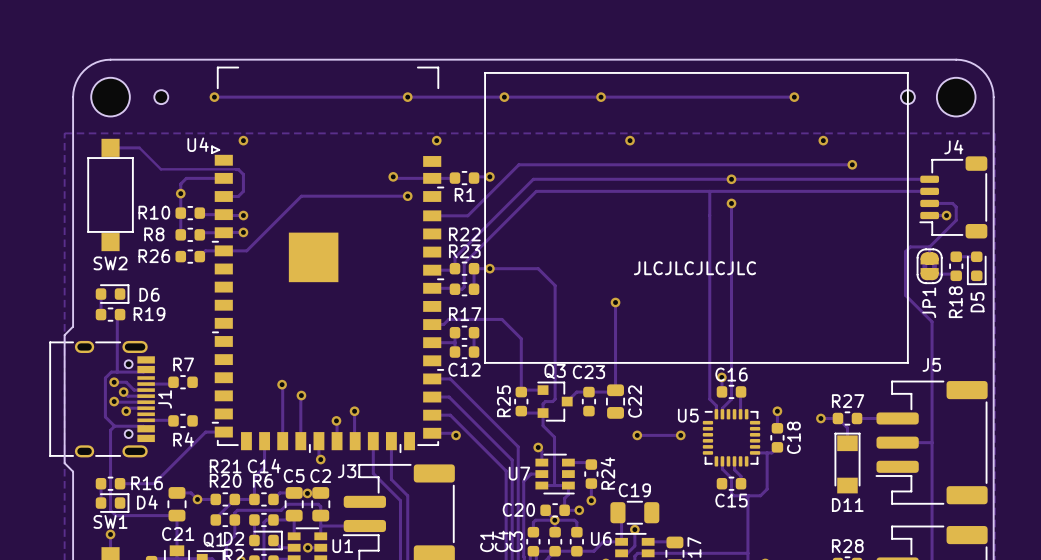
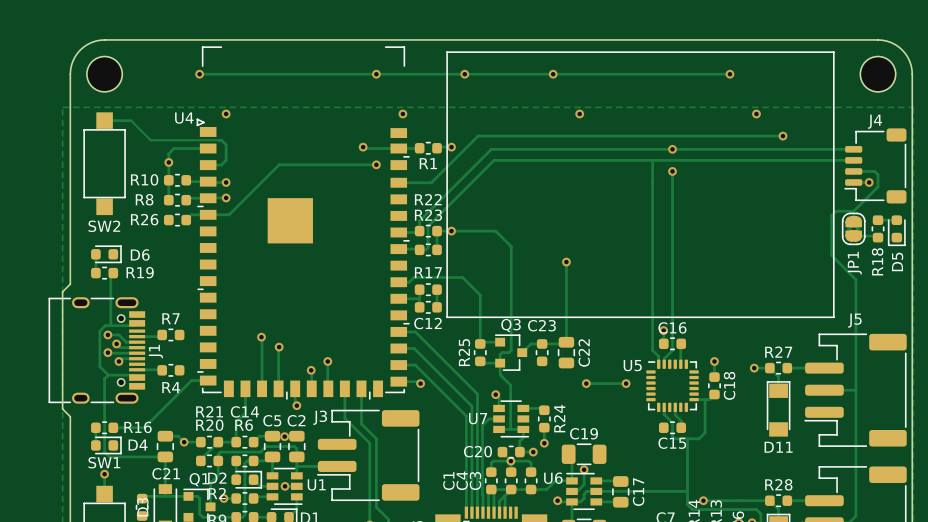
part: (161, 97) -> none
part: (907, 97) -> none
text: JLCJLCJLCJLC (694, 268) -> none

